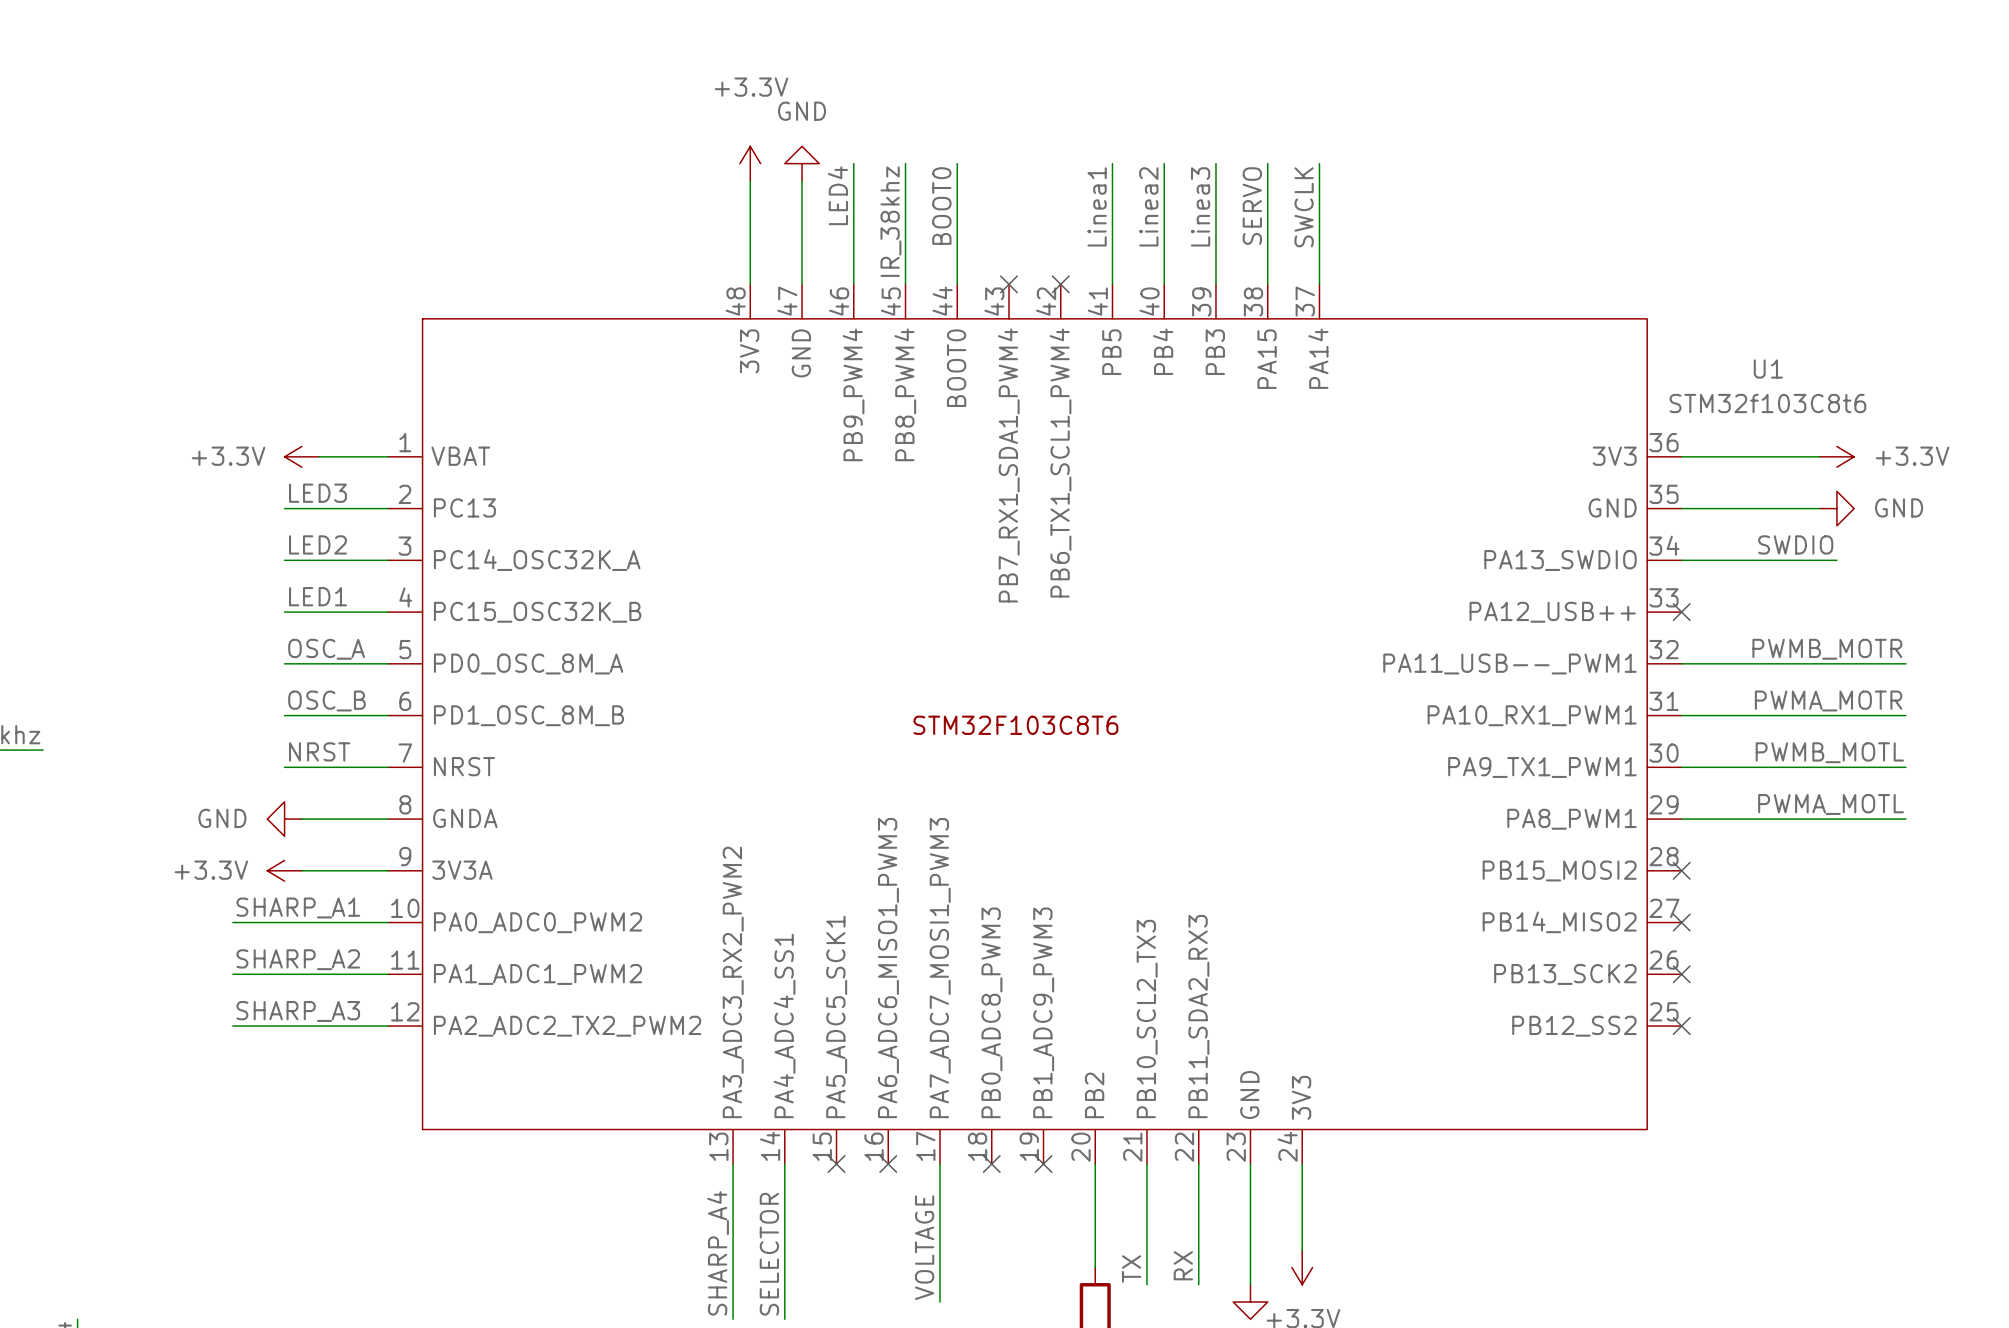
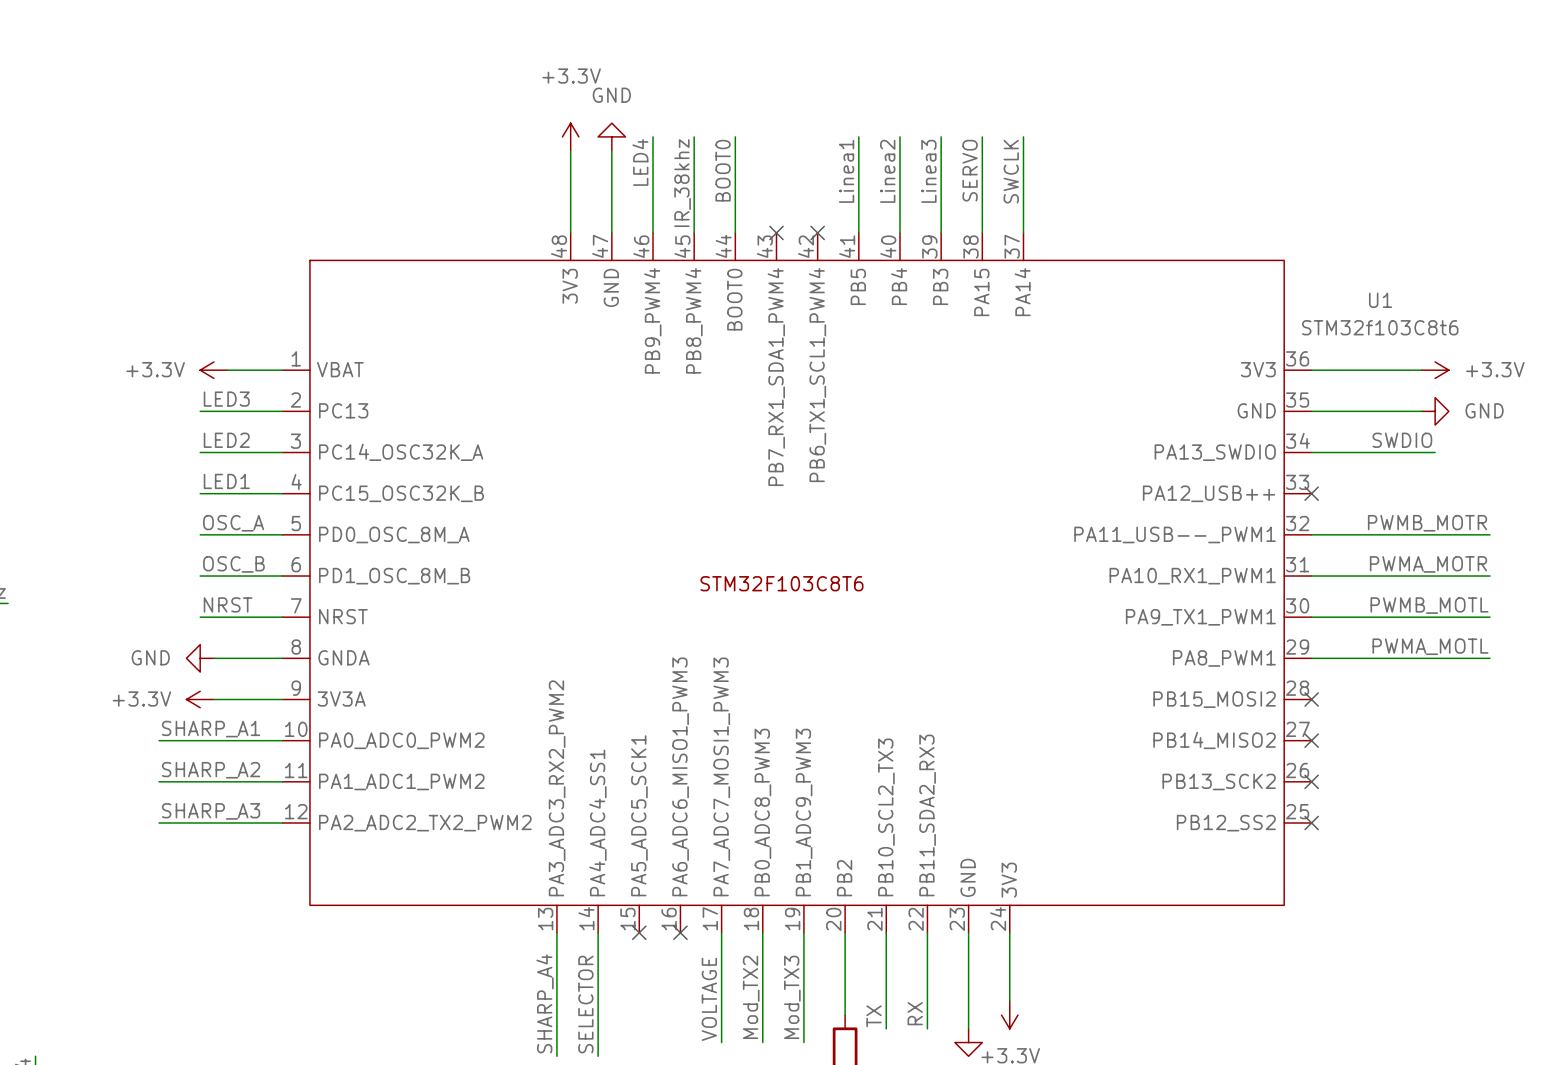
wire: none -> (762, 932) (762, 1042)
no-connect mark: (991, 1164) -> none
wire: none -> (803, 932) (803, 1042)
no-connect mark: (1043, 1164) -> none
label: none -> Mod_TX2 (751, 997)
label: none -> Mod_TX3 (792, 997)

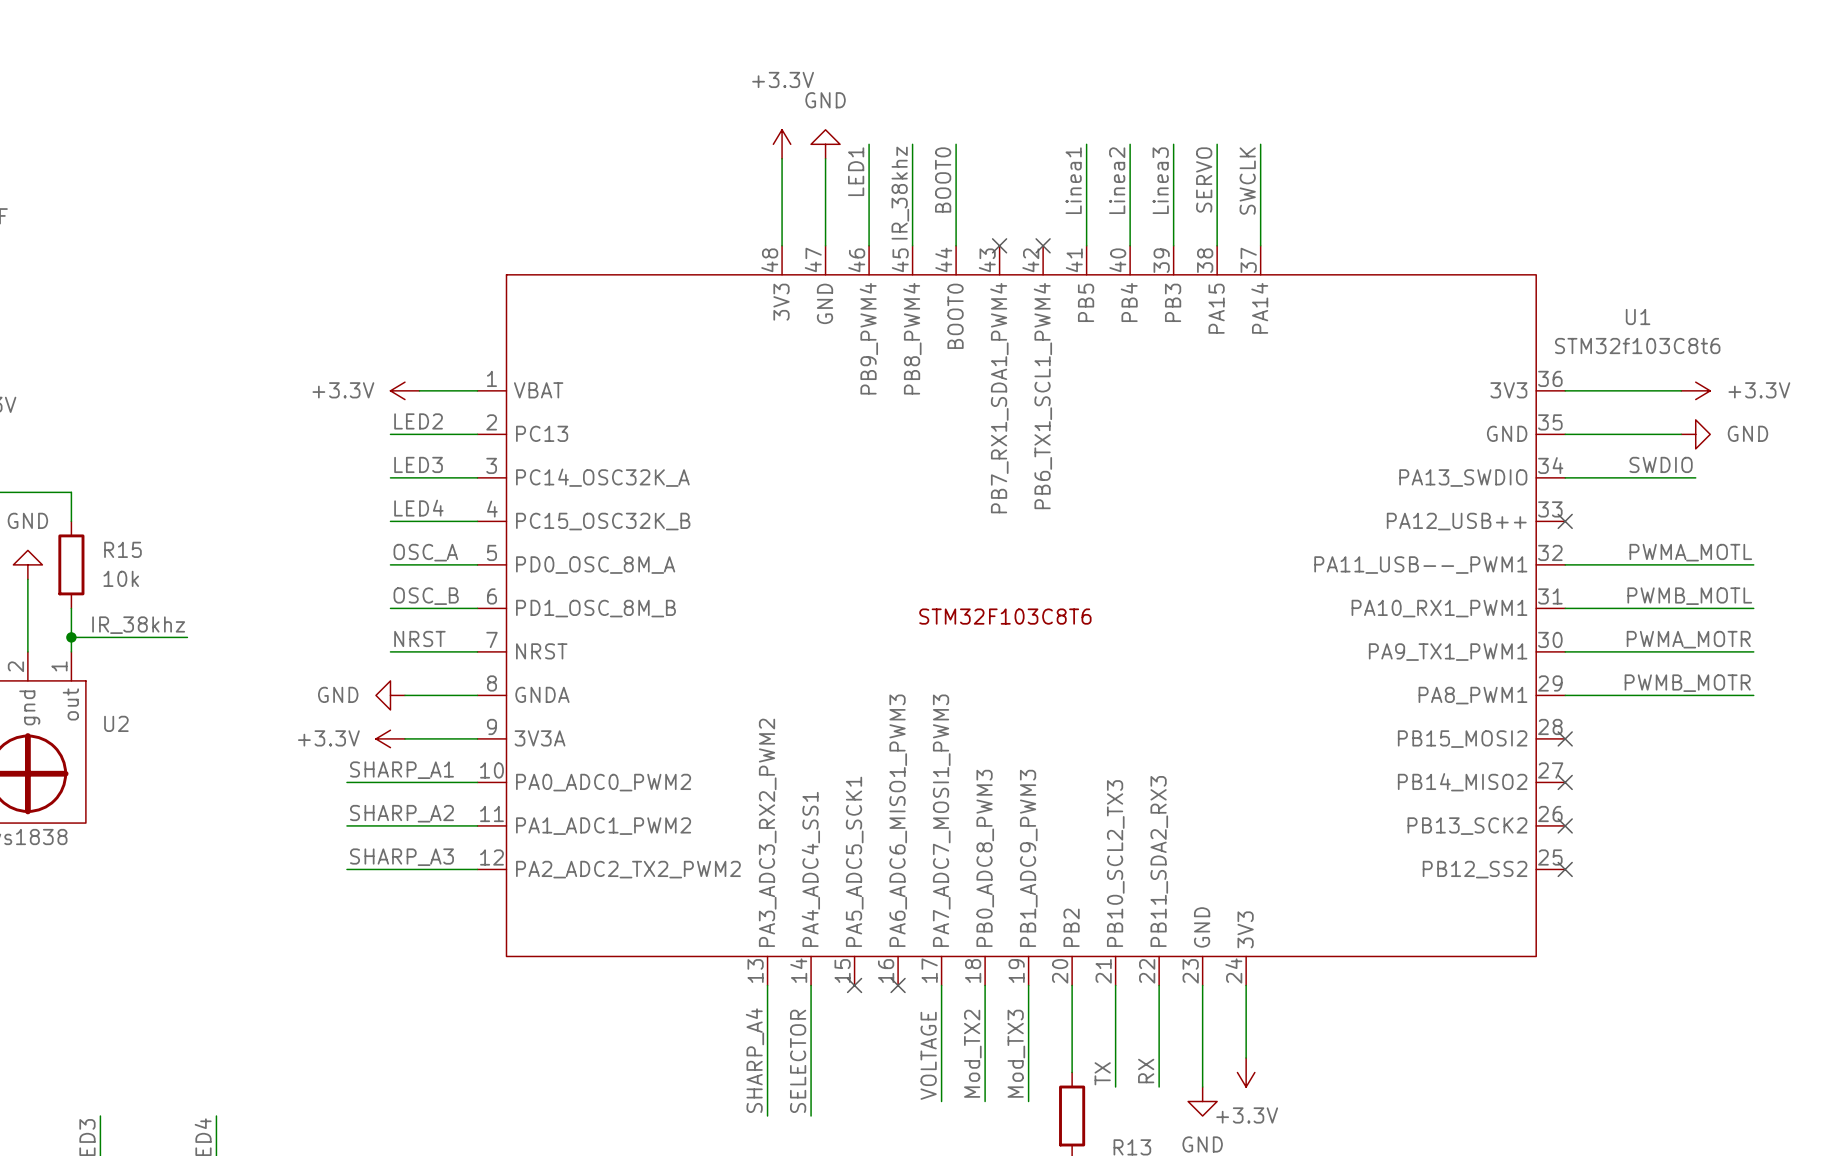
label: LED4 (640, 162) -> LED1 (856, 171)
label: LED3 (226, 399) -> LED2 (418, 421)
label: LED2 (226, 440) -> LED3 (418, 464)
label: LED1 (226, 481) -> LED4 (418, 508)
label: PWMB_MOTR (1427, 523) -> PWMA_MOTL (1690, 552)
label: PWMA_MOTR (1428, 564) -> PWMB_MOTL (1689, 596)
label: PWMB_MOTL (1429, 605) -> PWMA_MOTR (1688, 639)
label: PWMA_MOTL (1430, 646) -> PWMB_MOTR (1687, 683)

